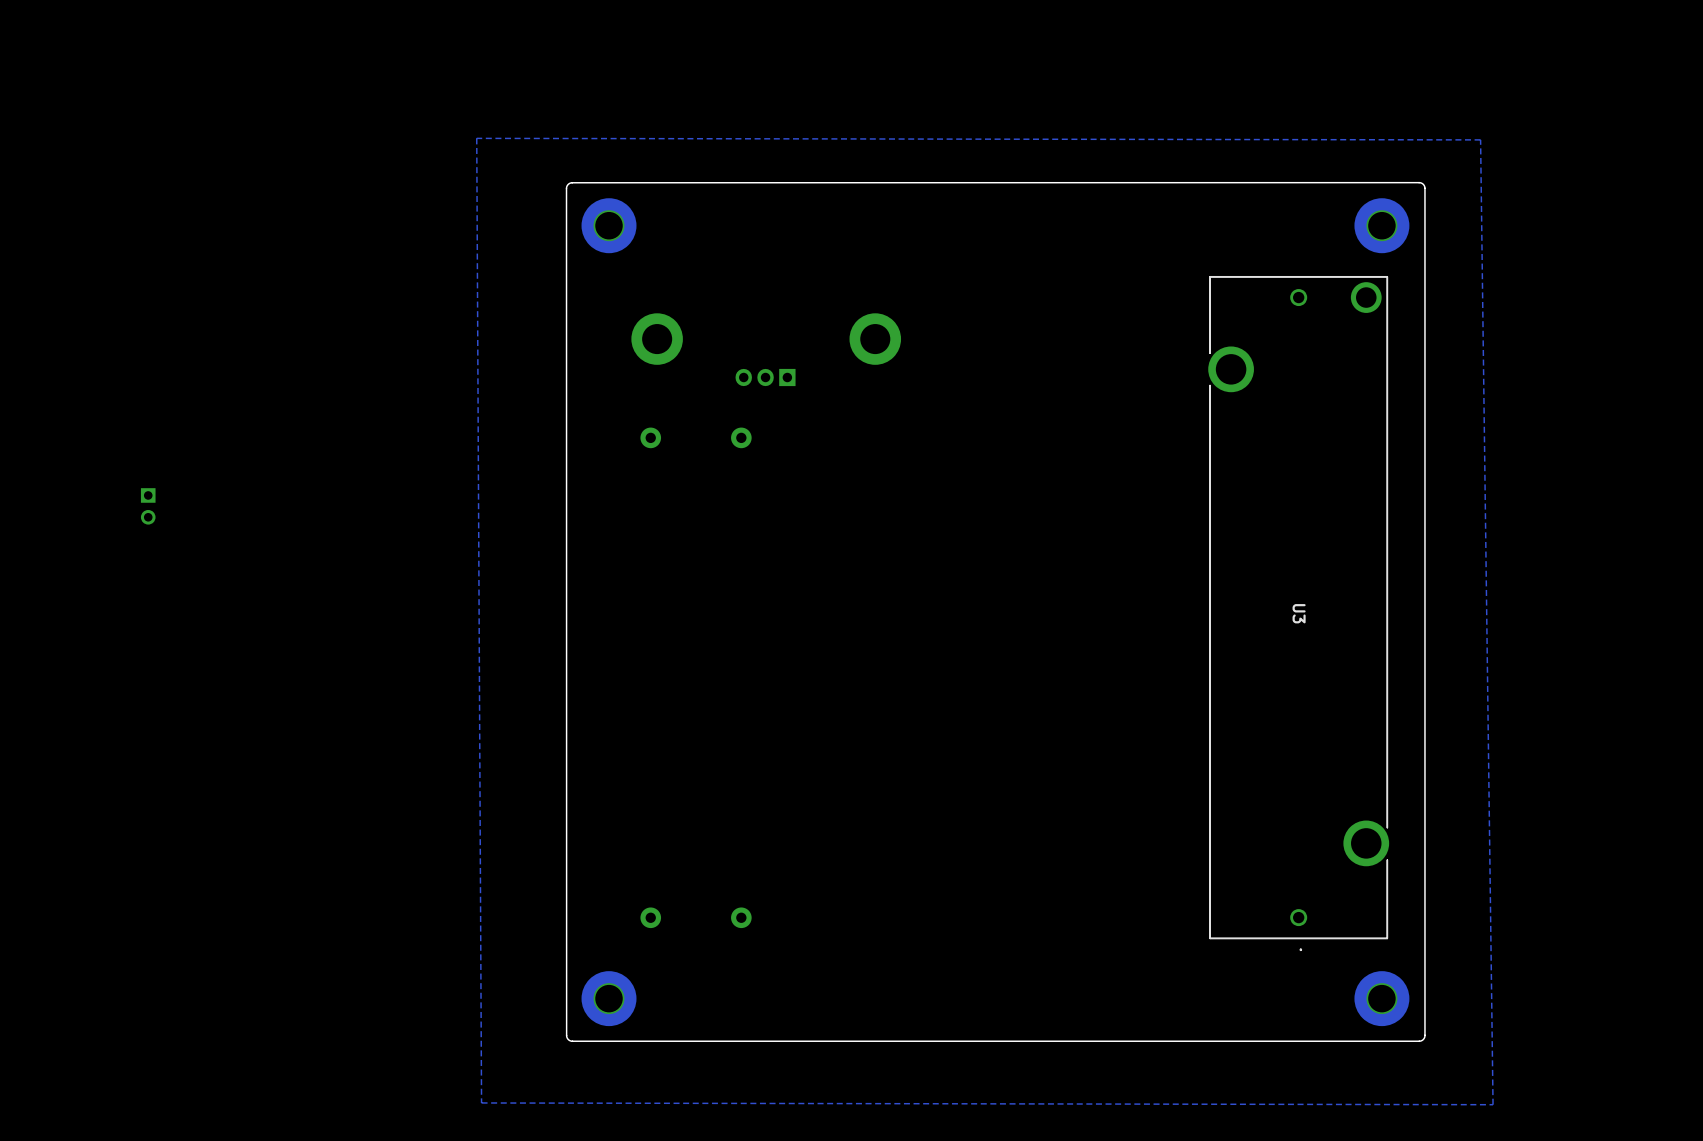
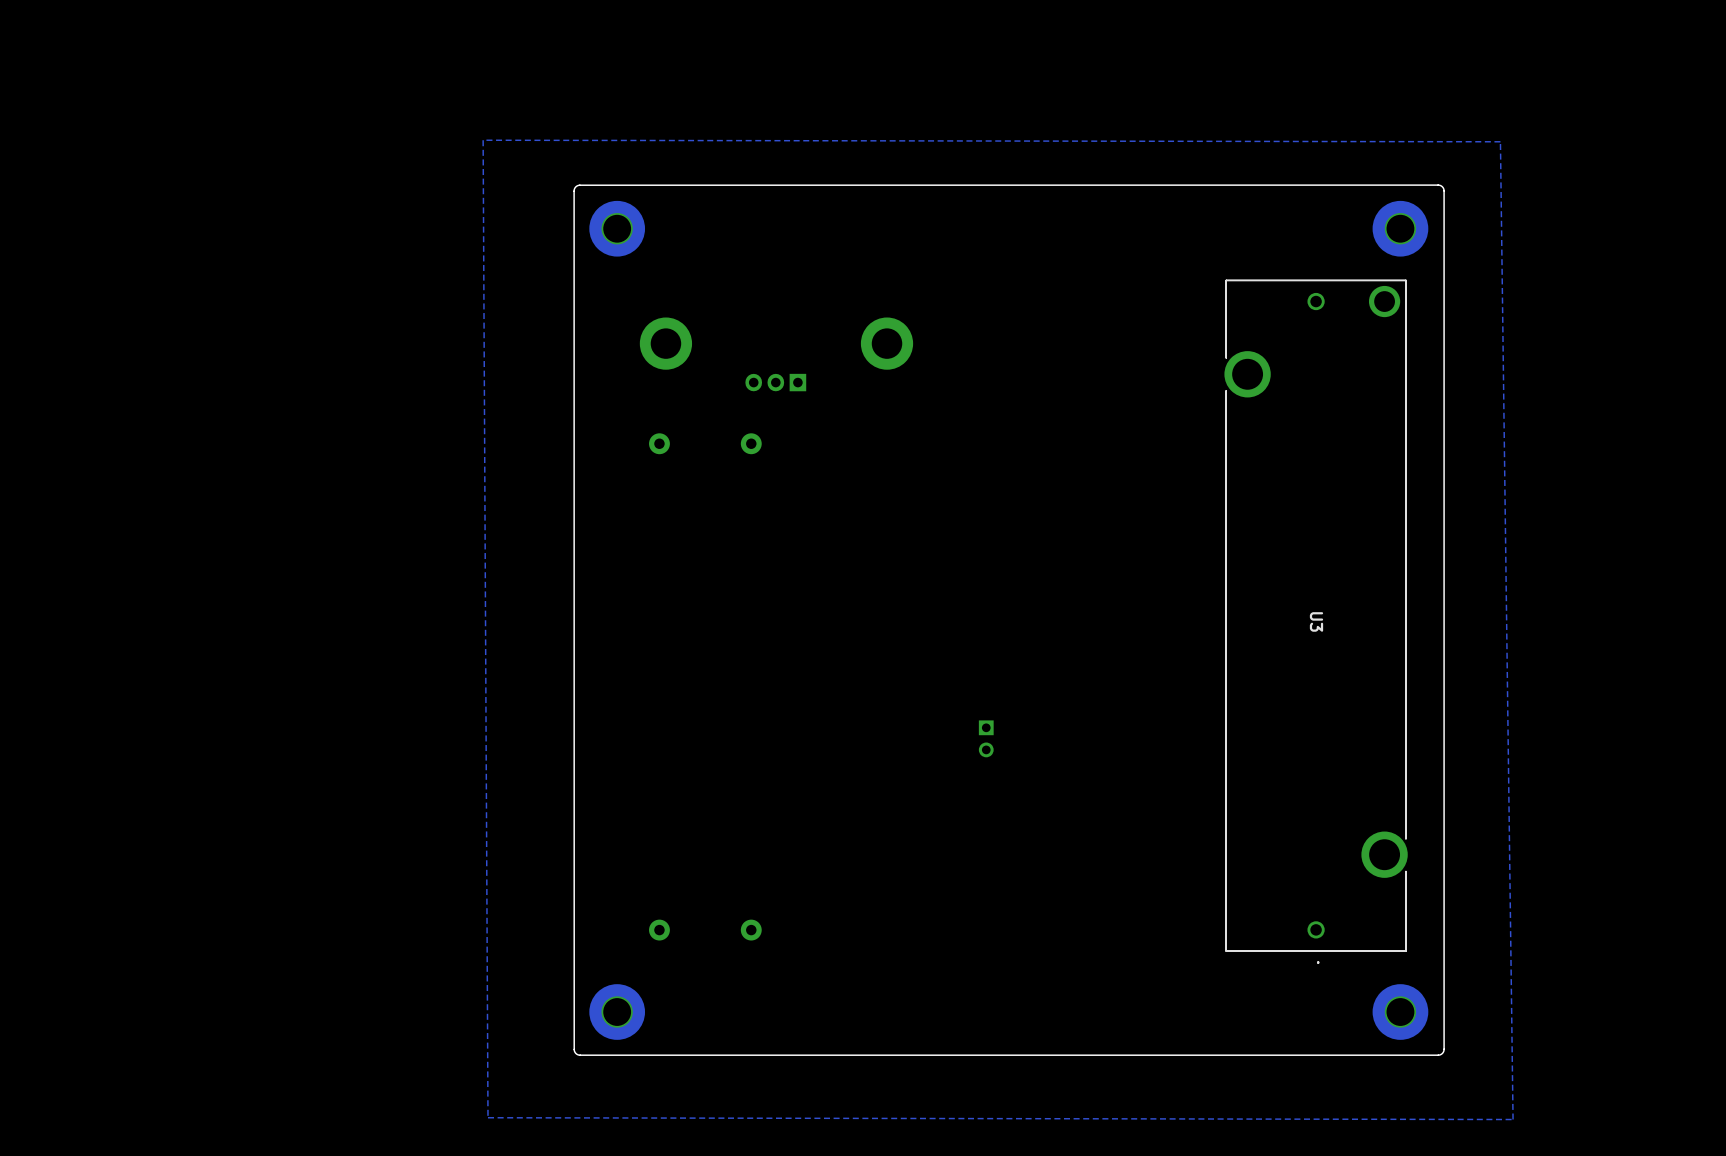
part: (148, 506) -> none
part: none -> (986, 738)

